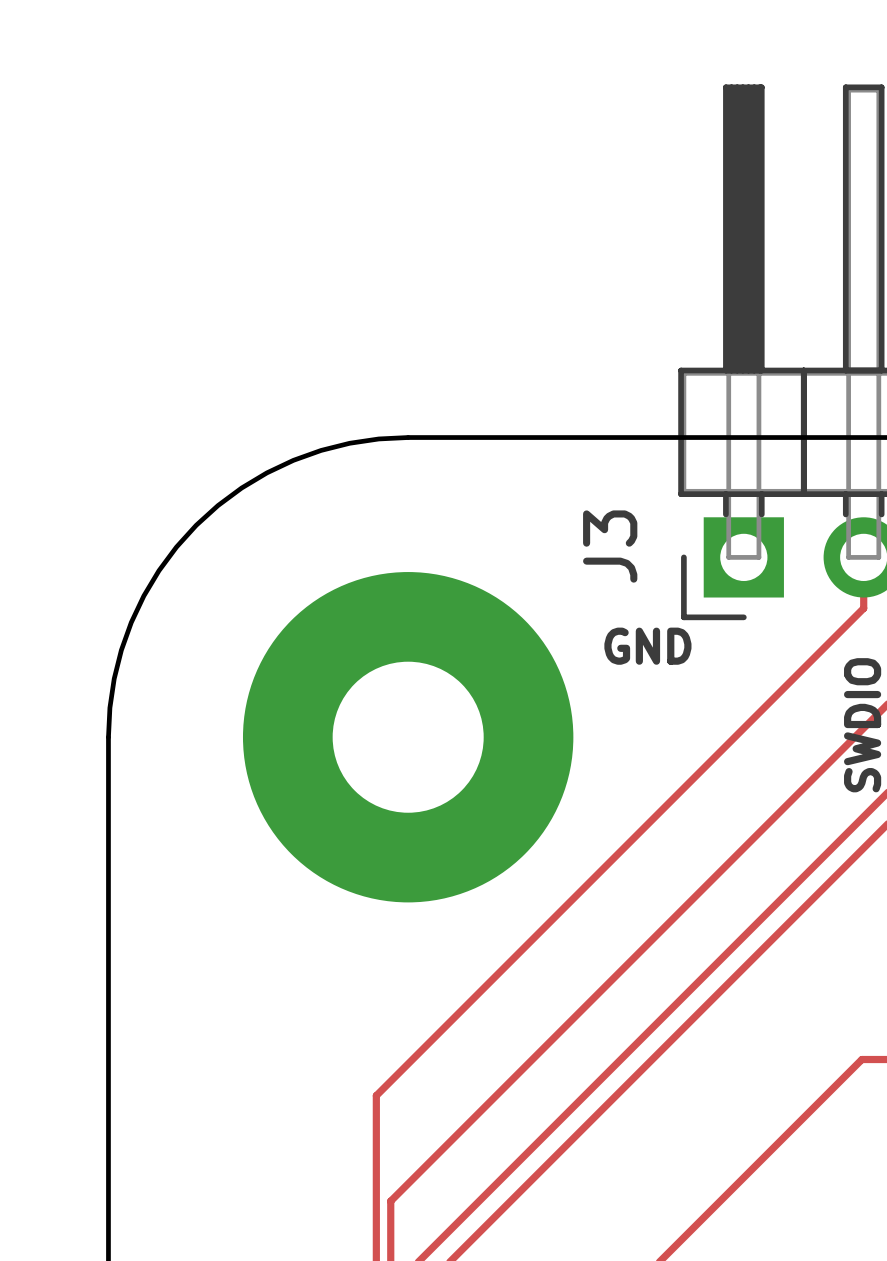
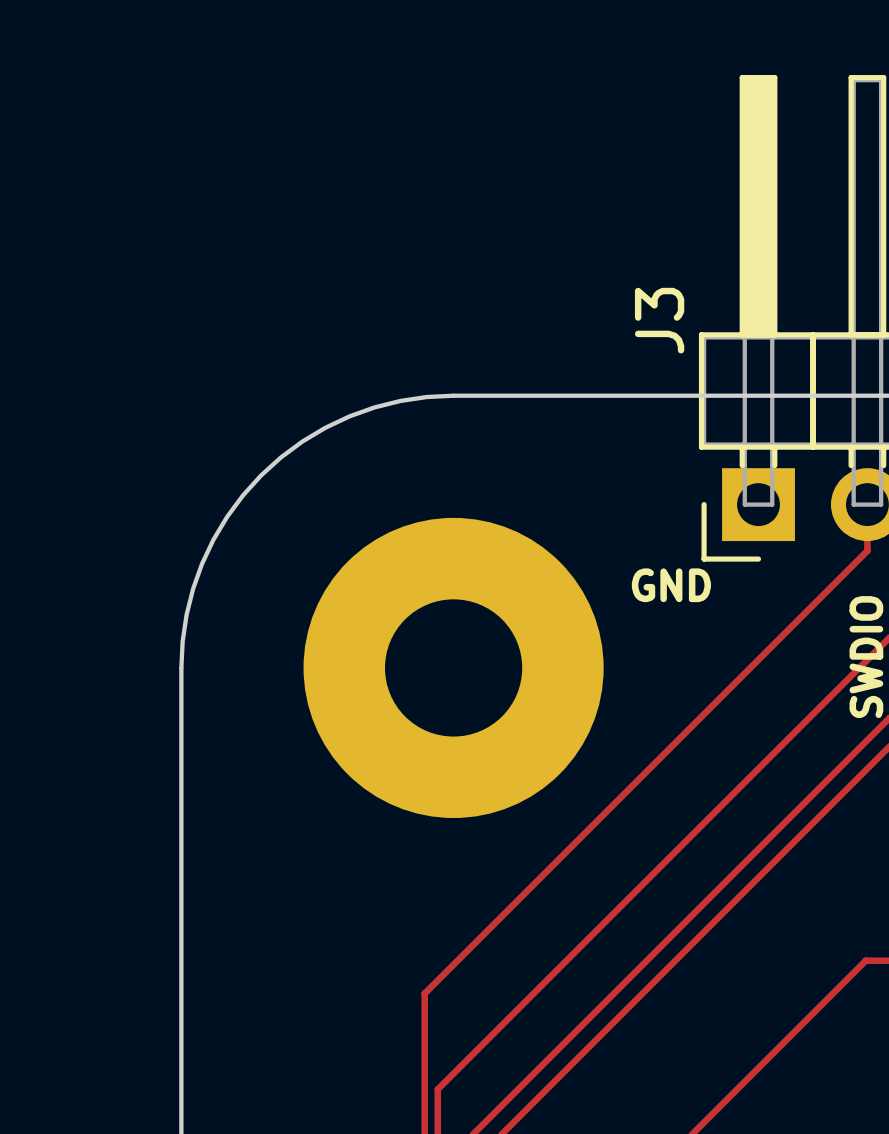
J3 name position: J3 (610, 546) -> J3 (659, 320)

